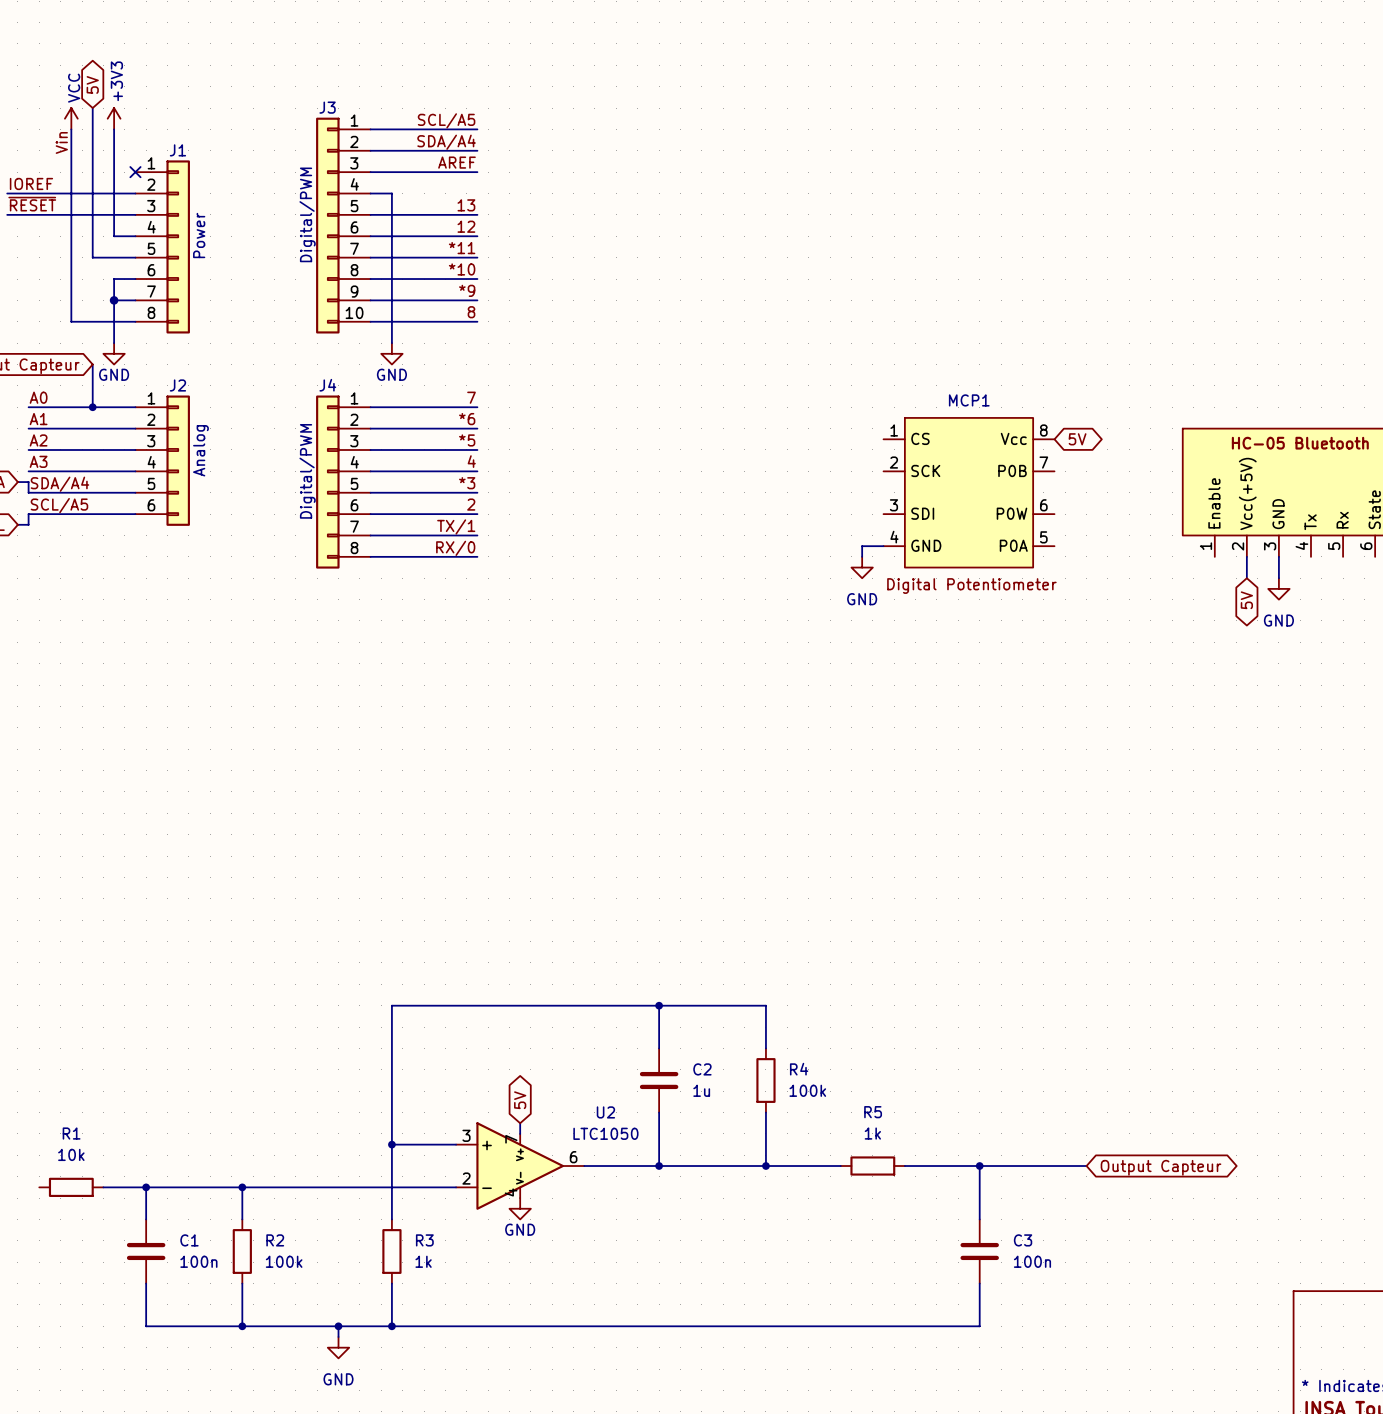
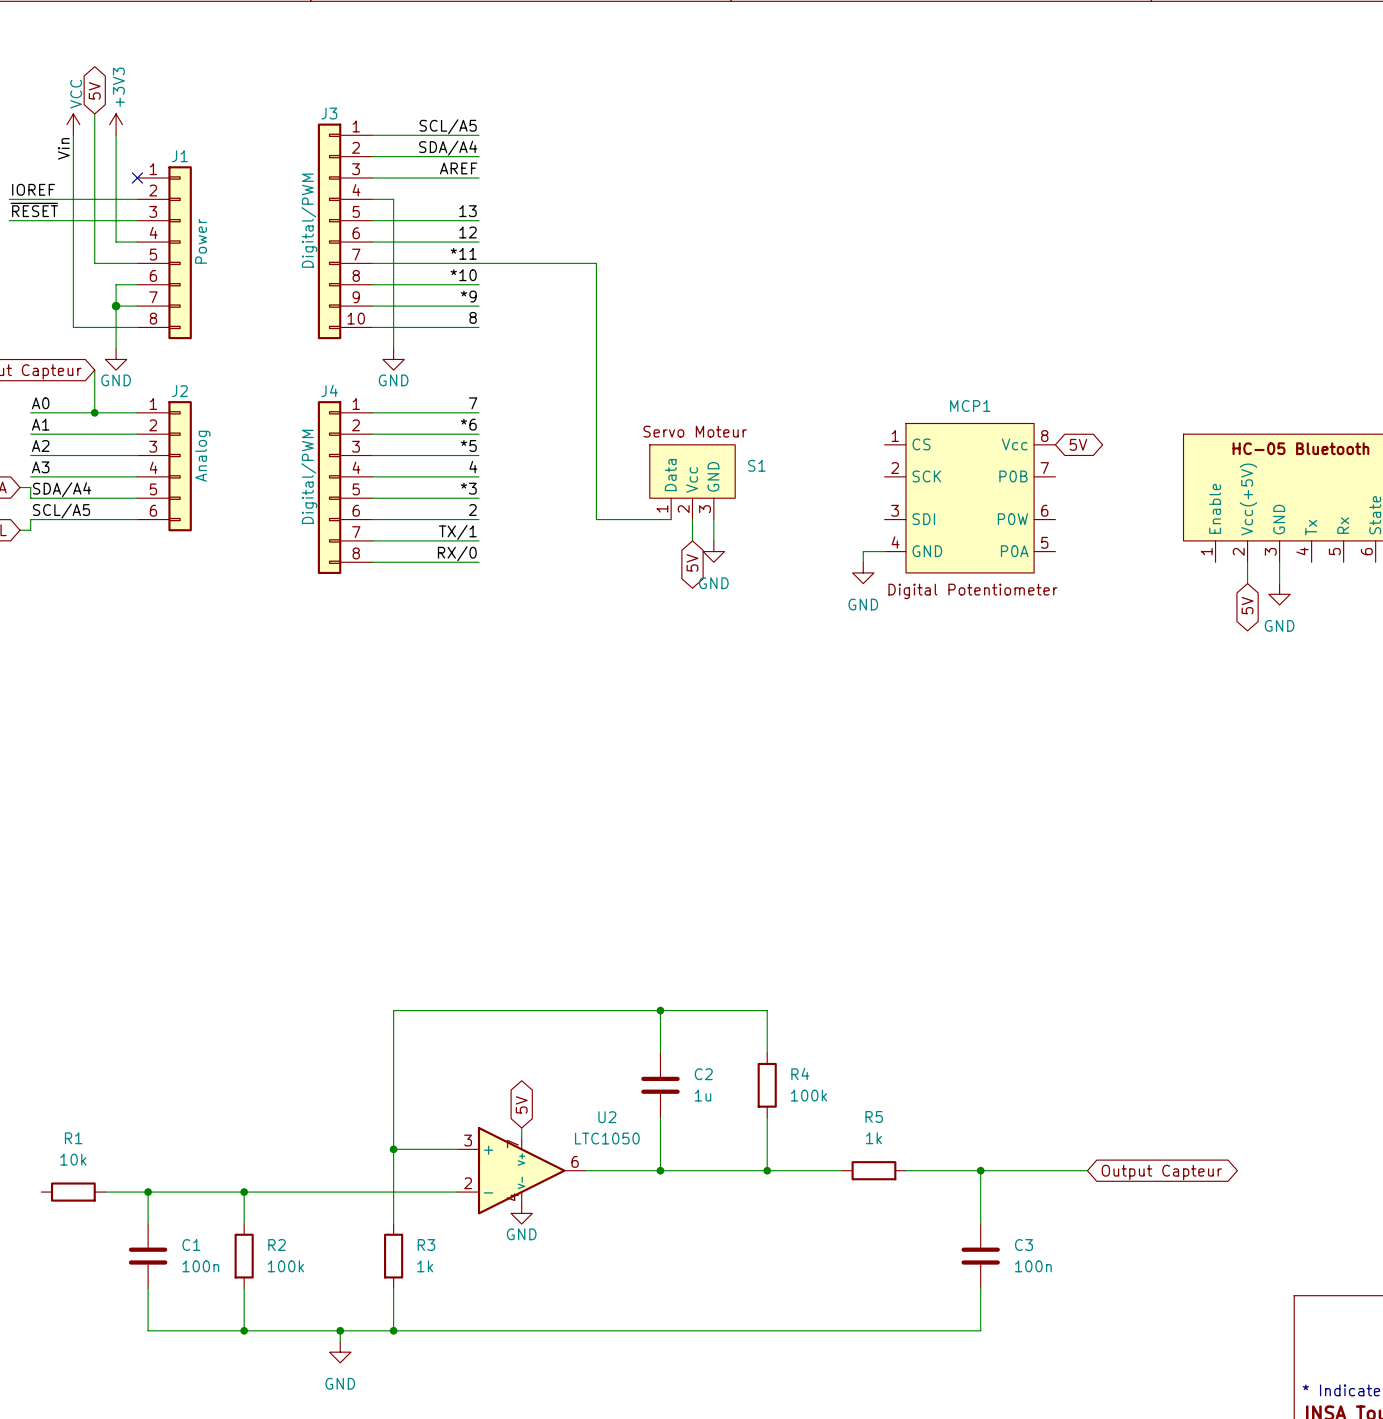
wire: none -> (479, 263) (596, 263) (596, 519) (671, 519)
S1: none -> (692, 482)
wire: none -> (692, 519) (692, 540)
wire: none -> (713, 519) (713, 540)
power symbol: none -> GND (713, 551)
global label: none -> 5V (692, 562)

